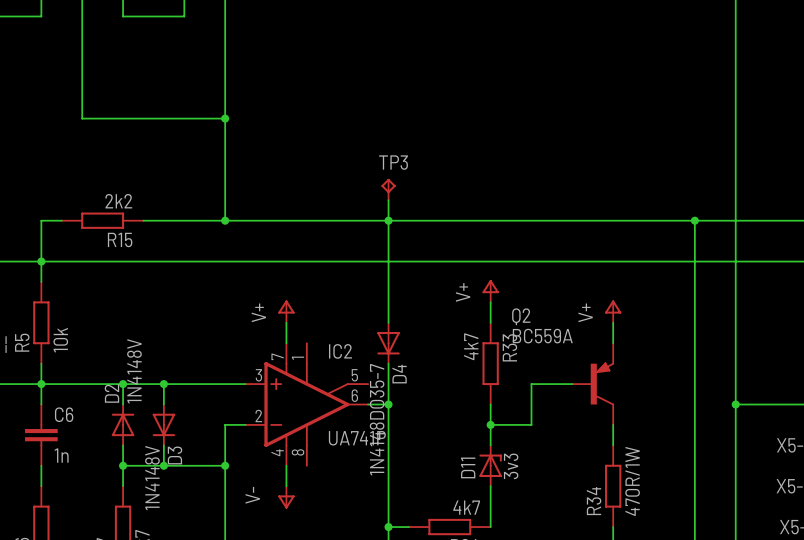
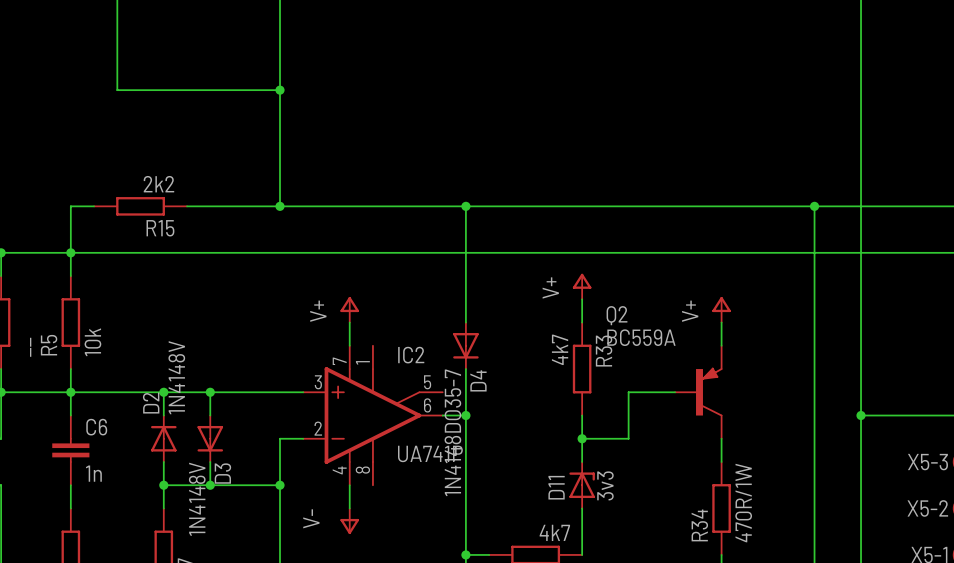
TP3: (388, 189) -> none
wire: (388, 200) (388, 220) -> none

